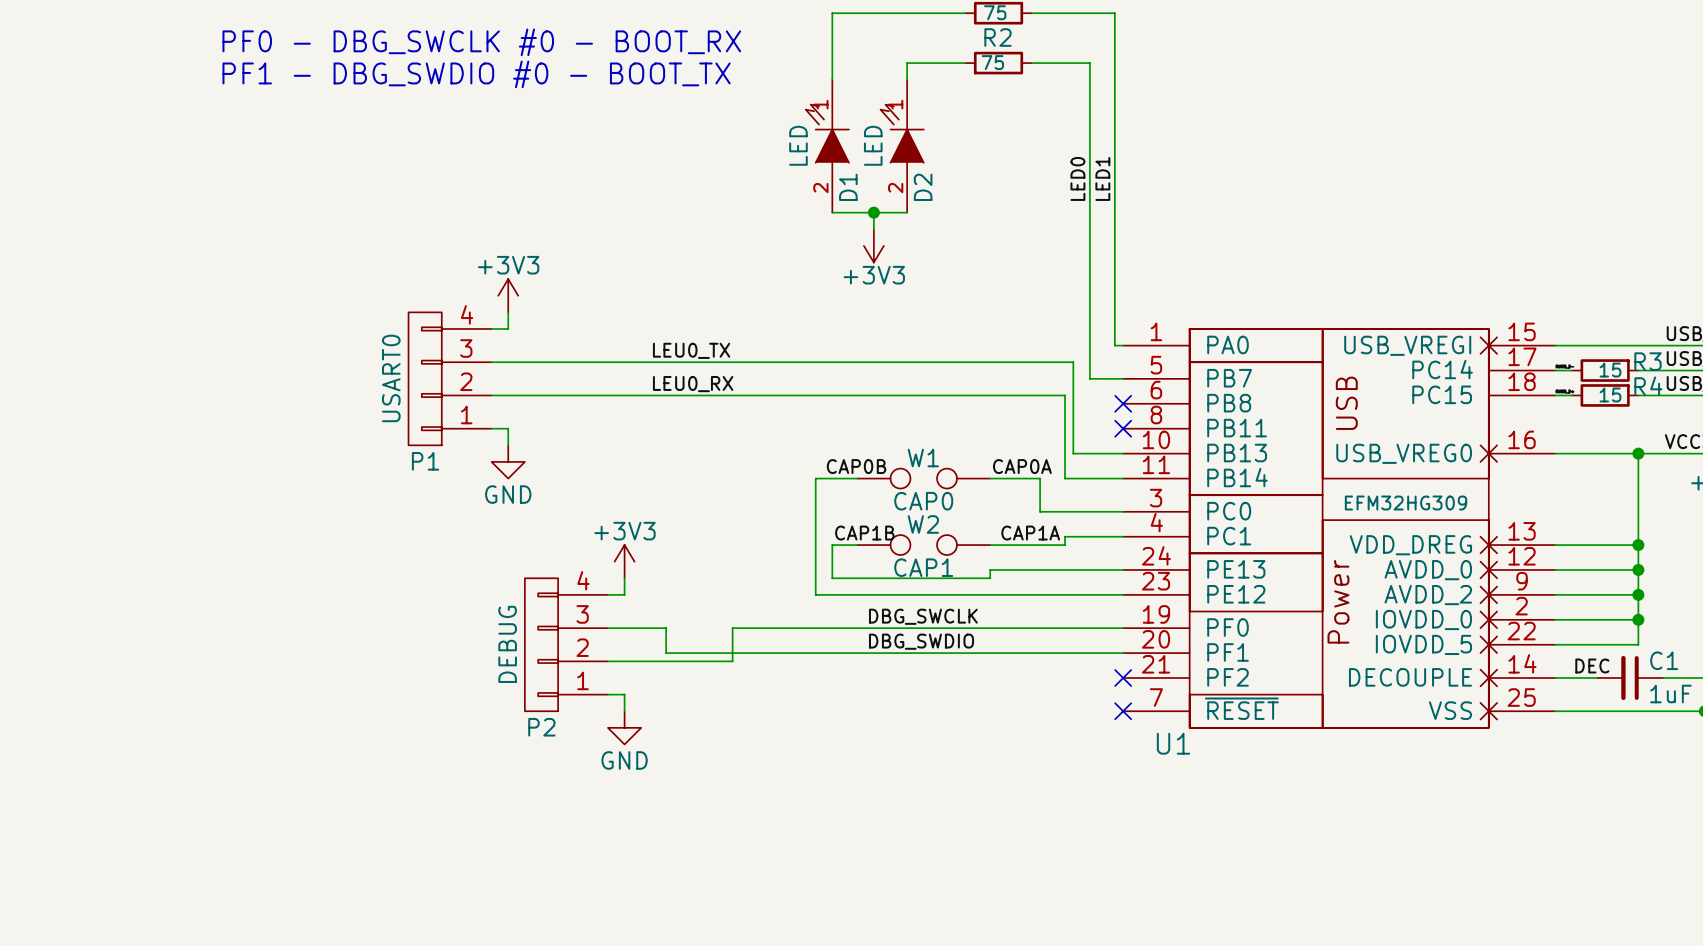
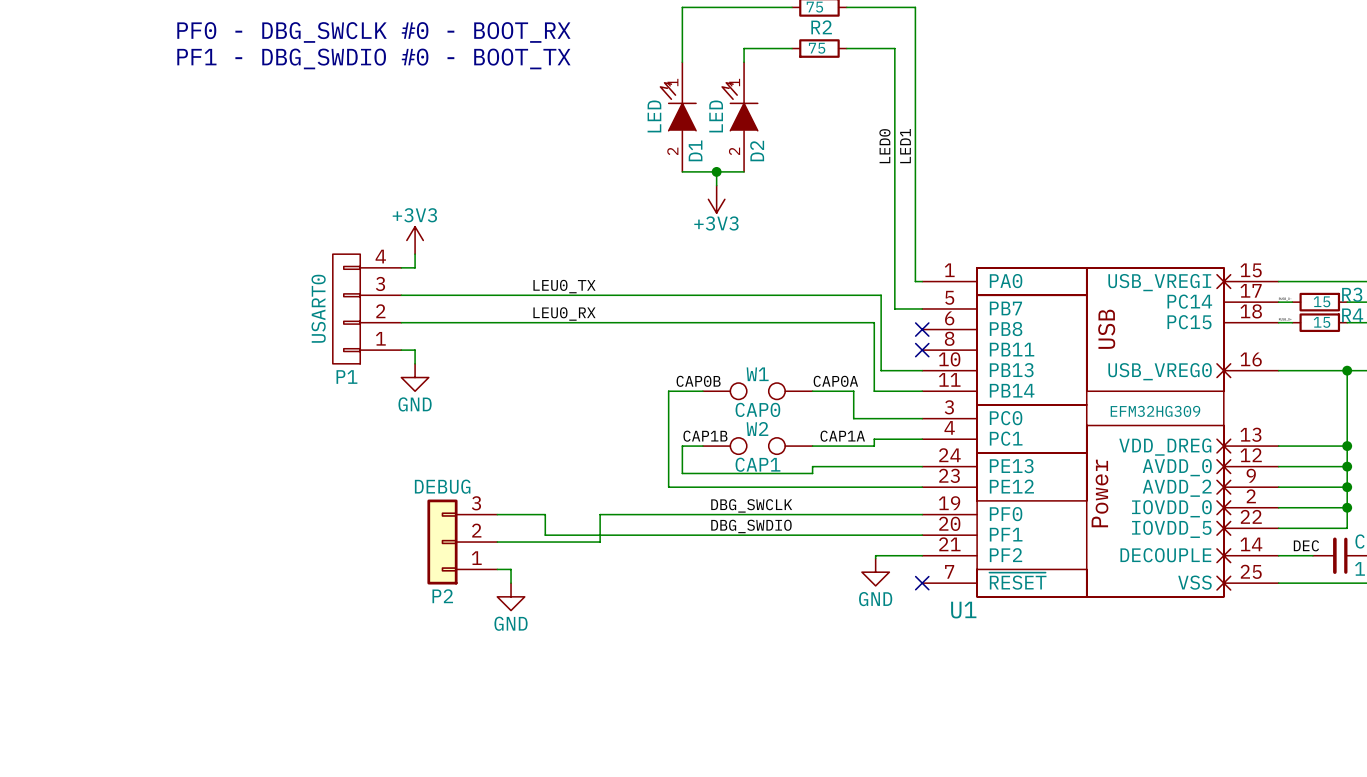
power symbol: +3V3 (624, 561) -> none
P2 symbol: [524, 578, 608, 712] -> [427, 499, 498, 585]
wire: (624, 578) (624, 594) (607, 594) -> none
P2 value position: DEBUG (507, 644) -> DEBUG (442, 486)
wire: none -> (922, 555) (875, 555) (875, 558)
no-connect mark: (1123, 678) -> none
power symbol: none -> GND (875, 572)

